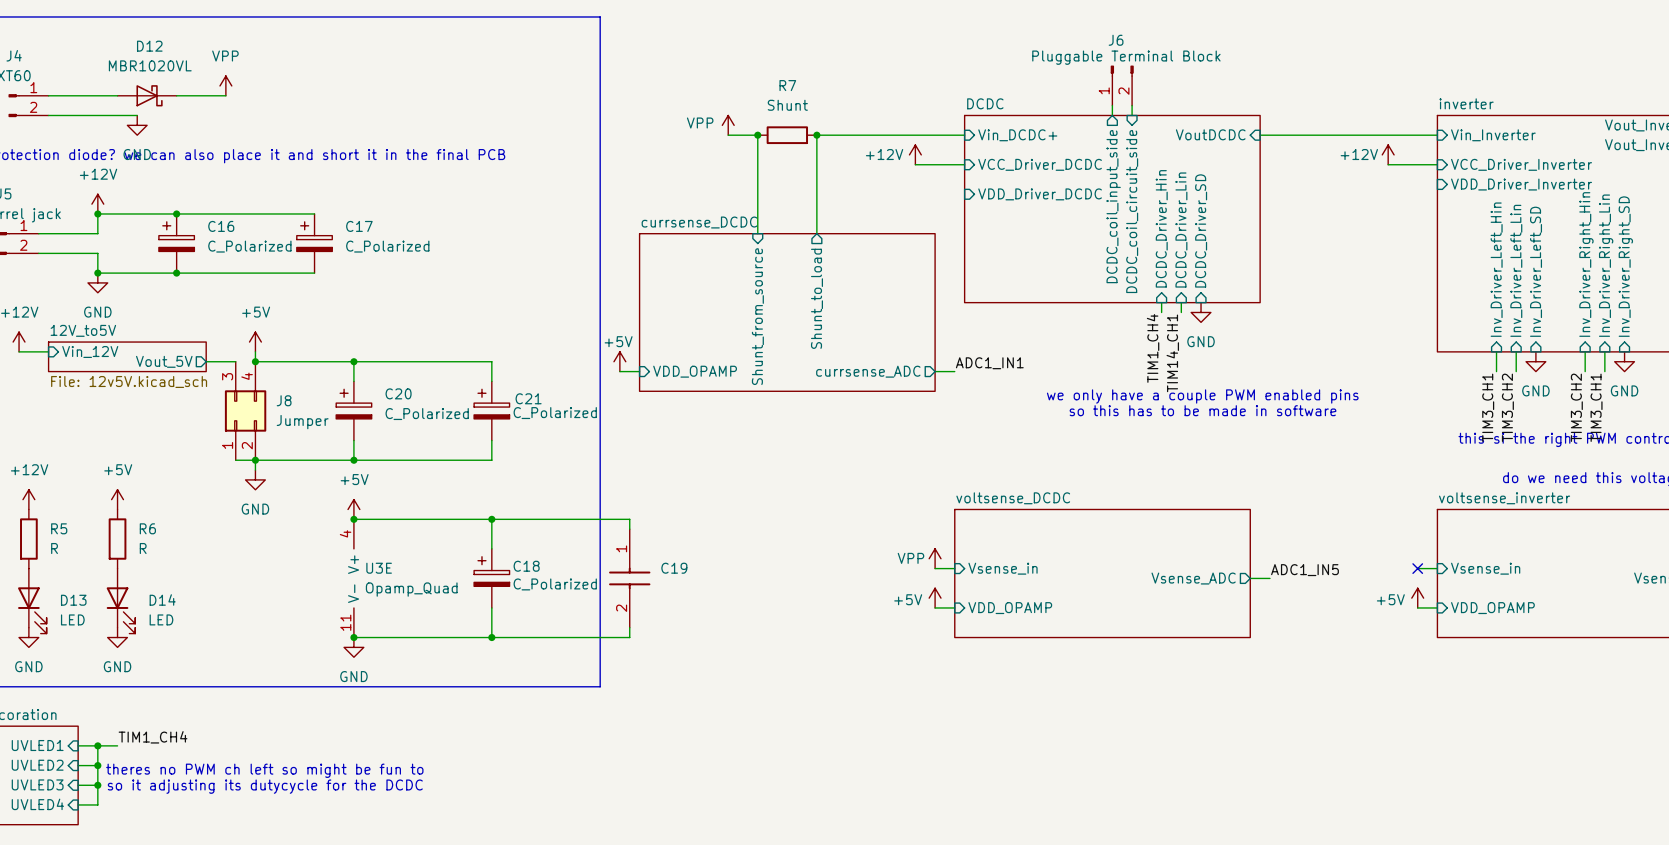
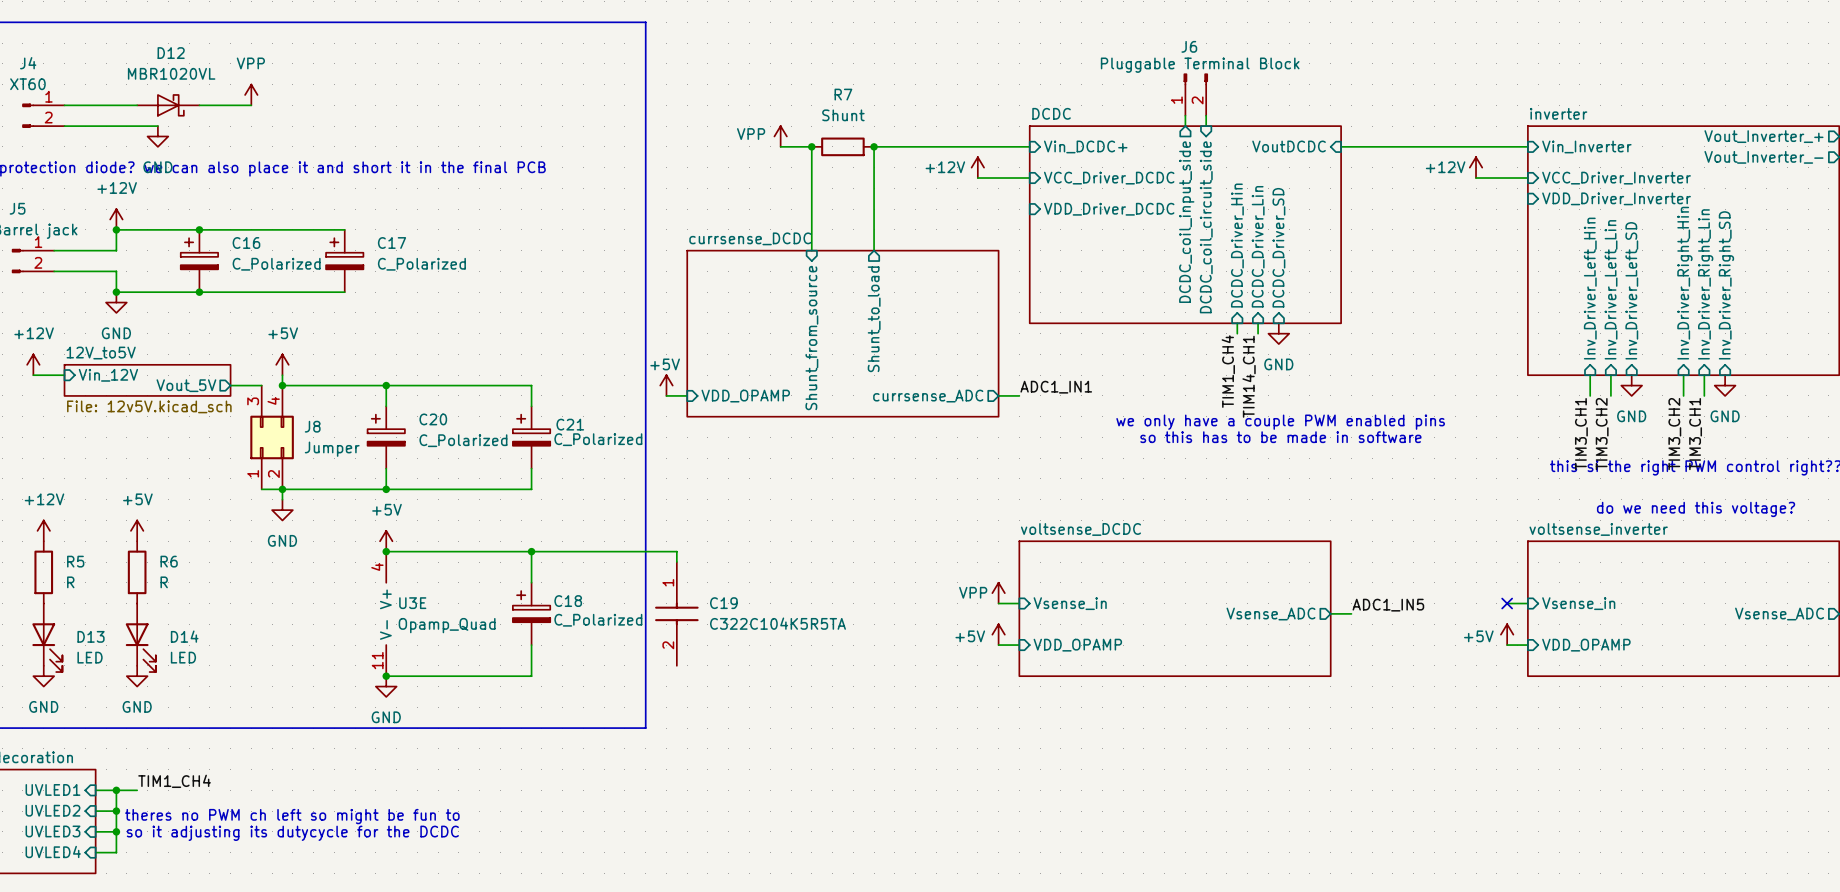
C19 value: none -> C322C104K5R5TA (778, 623)
wire: (629, 627) (629, 637) (491, 637) -> none
junction: (491, 637) -> none

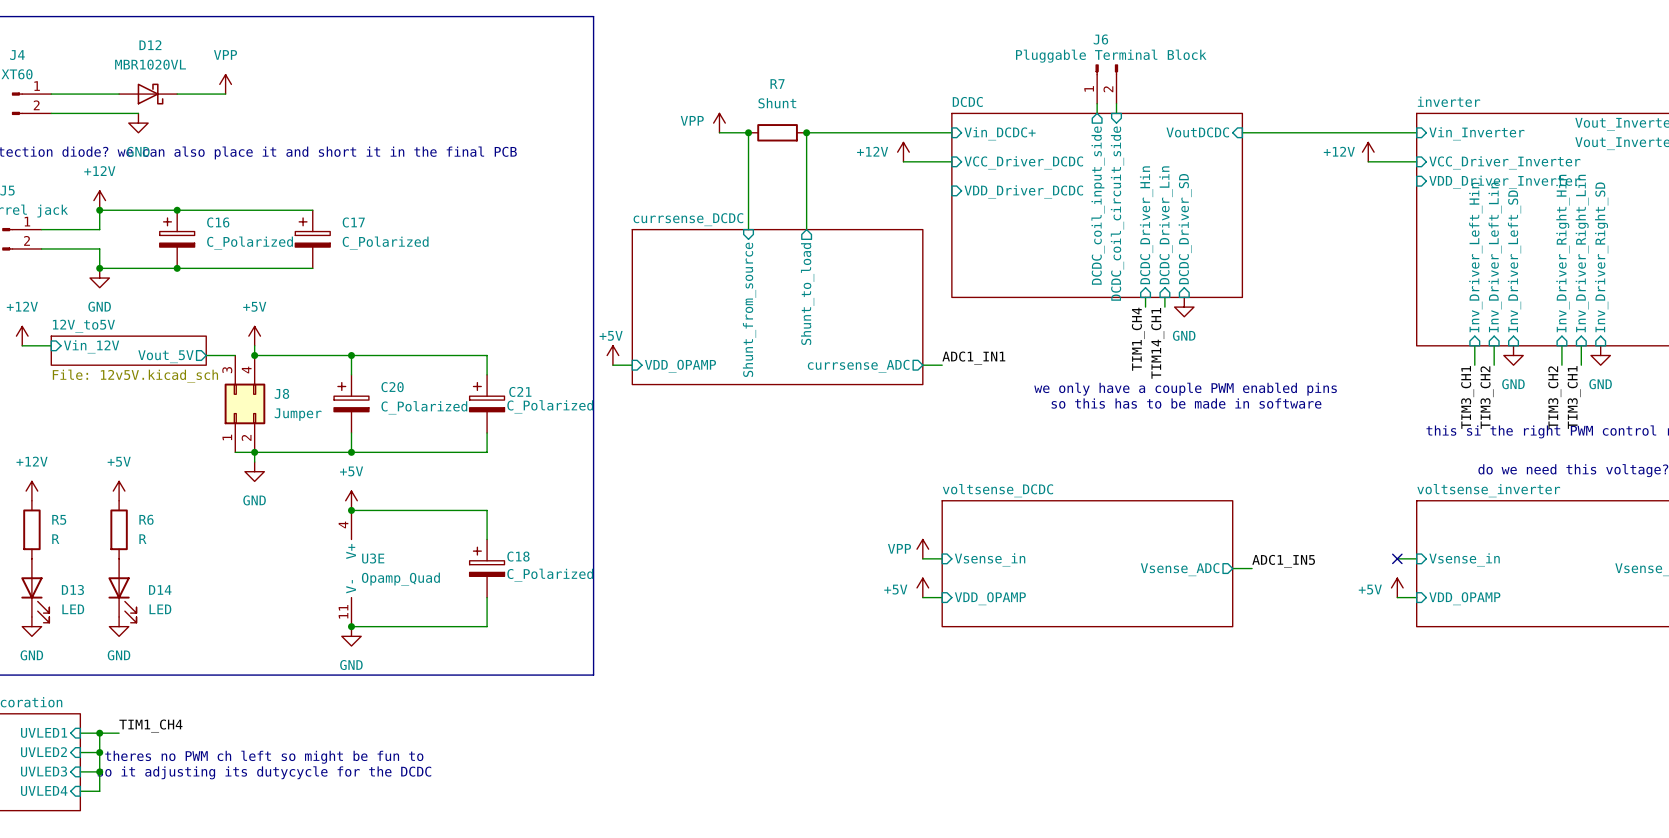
wire: (531, 551) (676, 551) (676, 562) -> none
junction: (531, 551) -> none
C19: C322C104K5R5TA (676, 613) -> none

